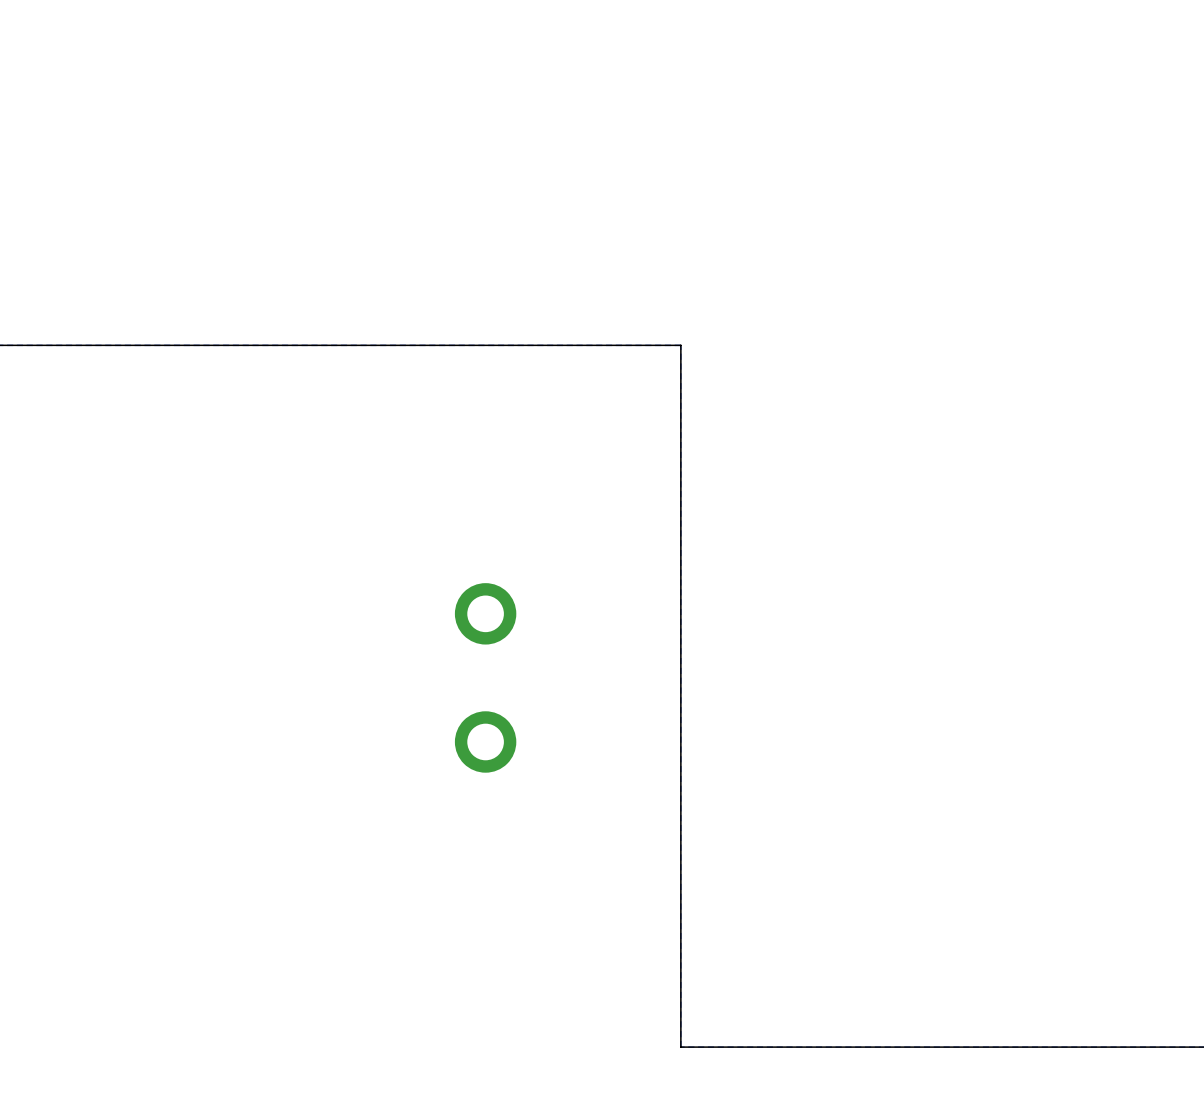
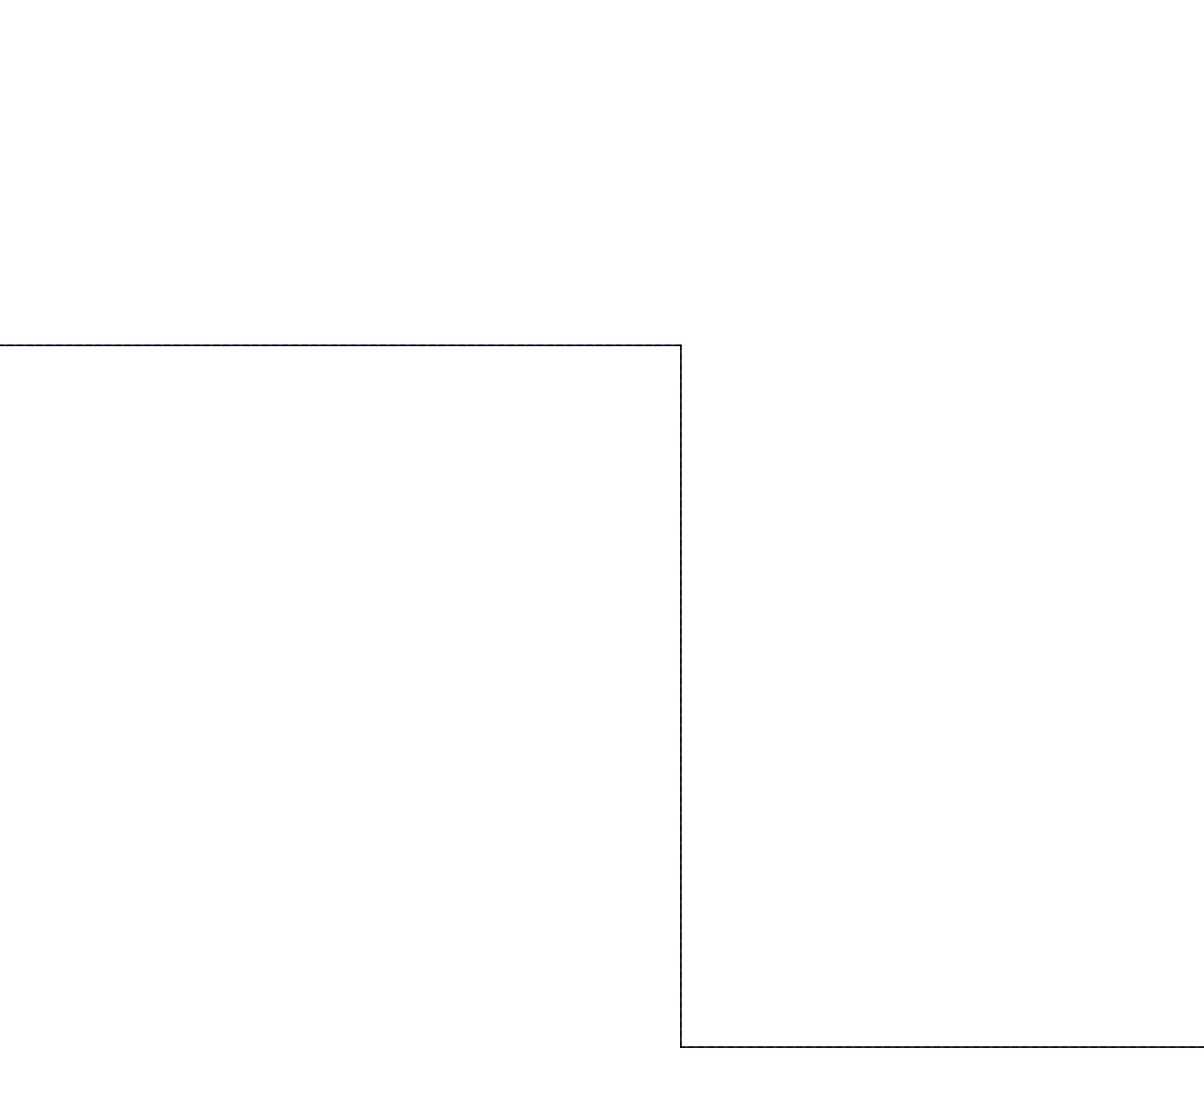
via: (485, 613) -> none
via: (485, 741) -> none

